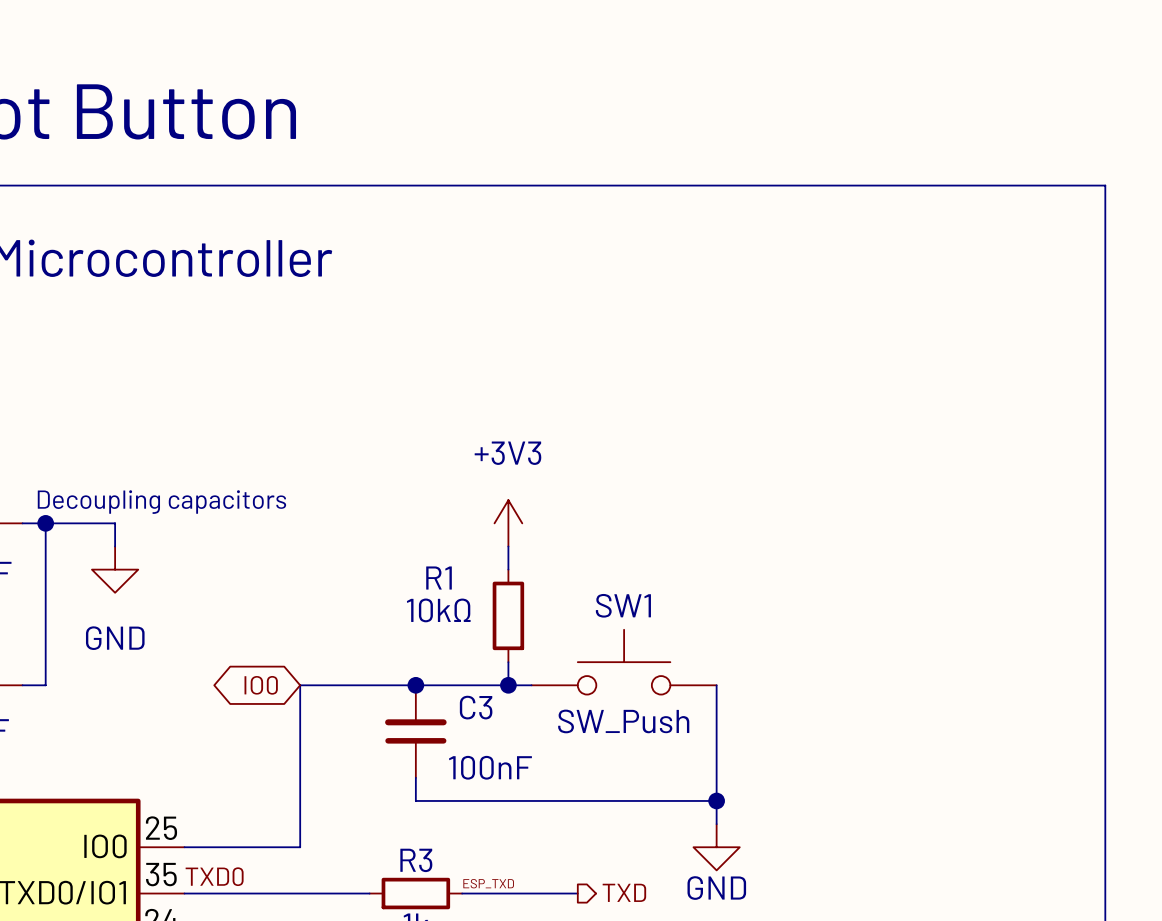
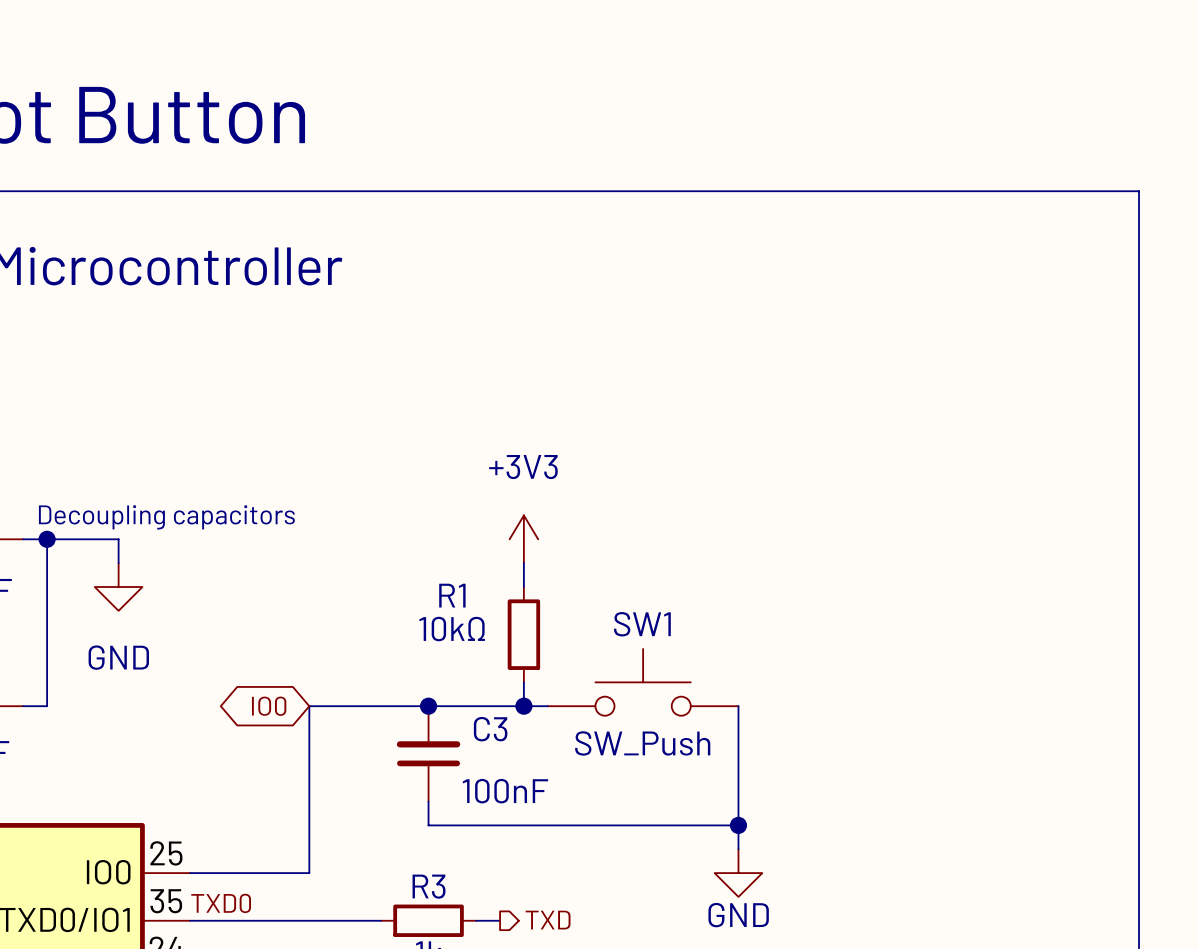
label: ESP_TXD (488, 883) -> none
hierarchical label position: TXD (624, 892) -> TXD (548, 920)
wire: (485, 893) (577, 893) -> none

